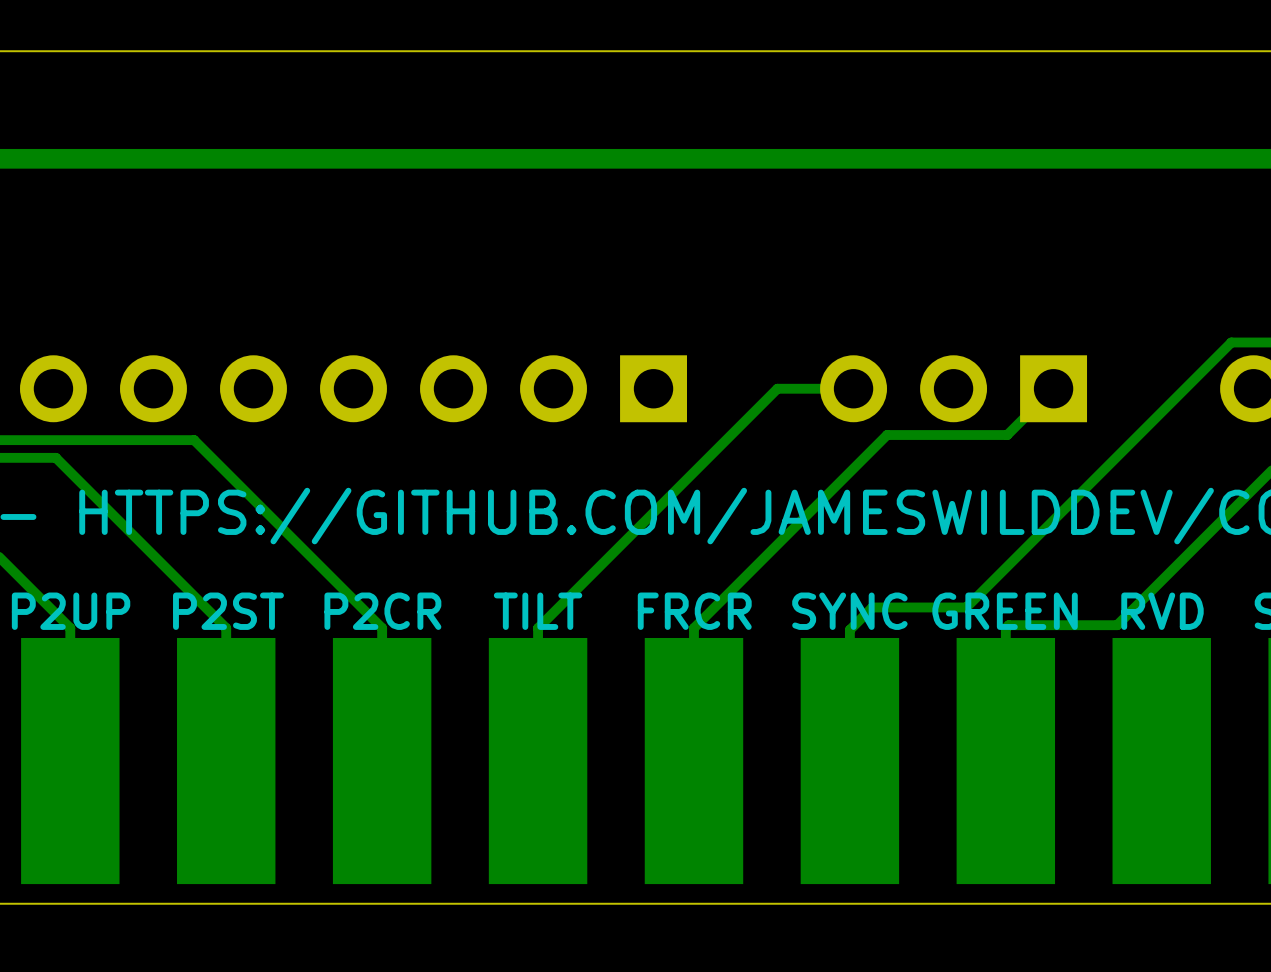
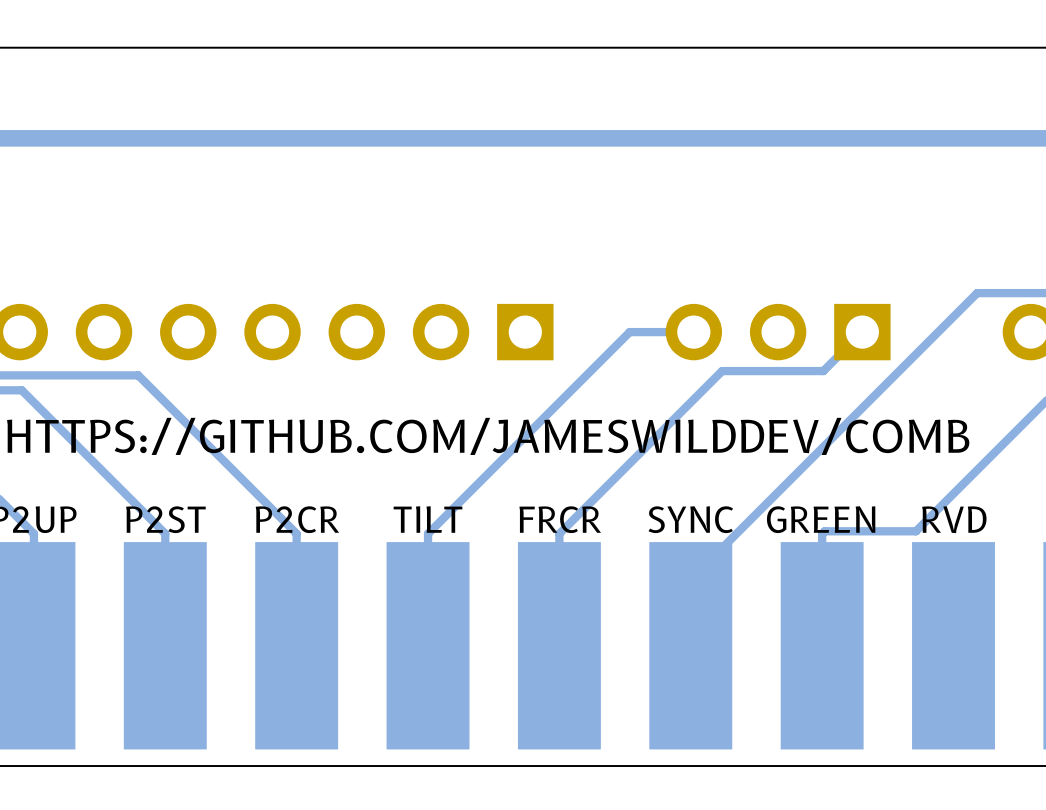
track: (1231, 342) (966, 607) (872, 607) (849, 629) (849, 682) -> (1012, 293) (977, 293) (690, 579)

